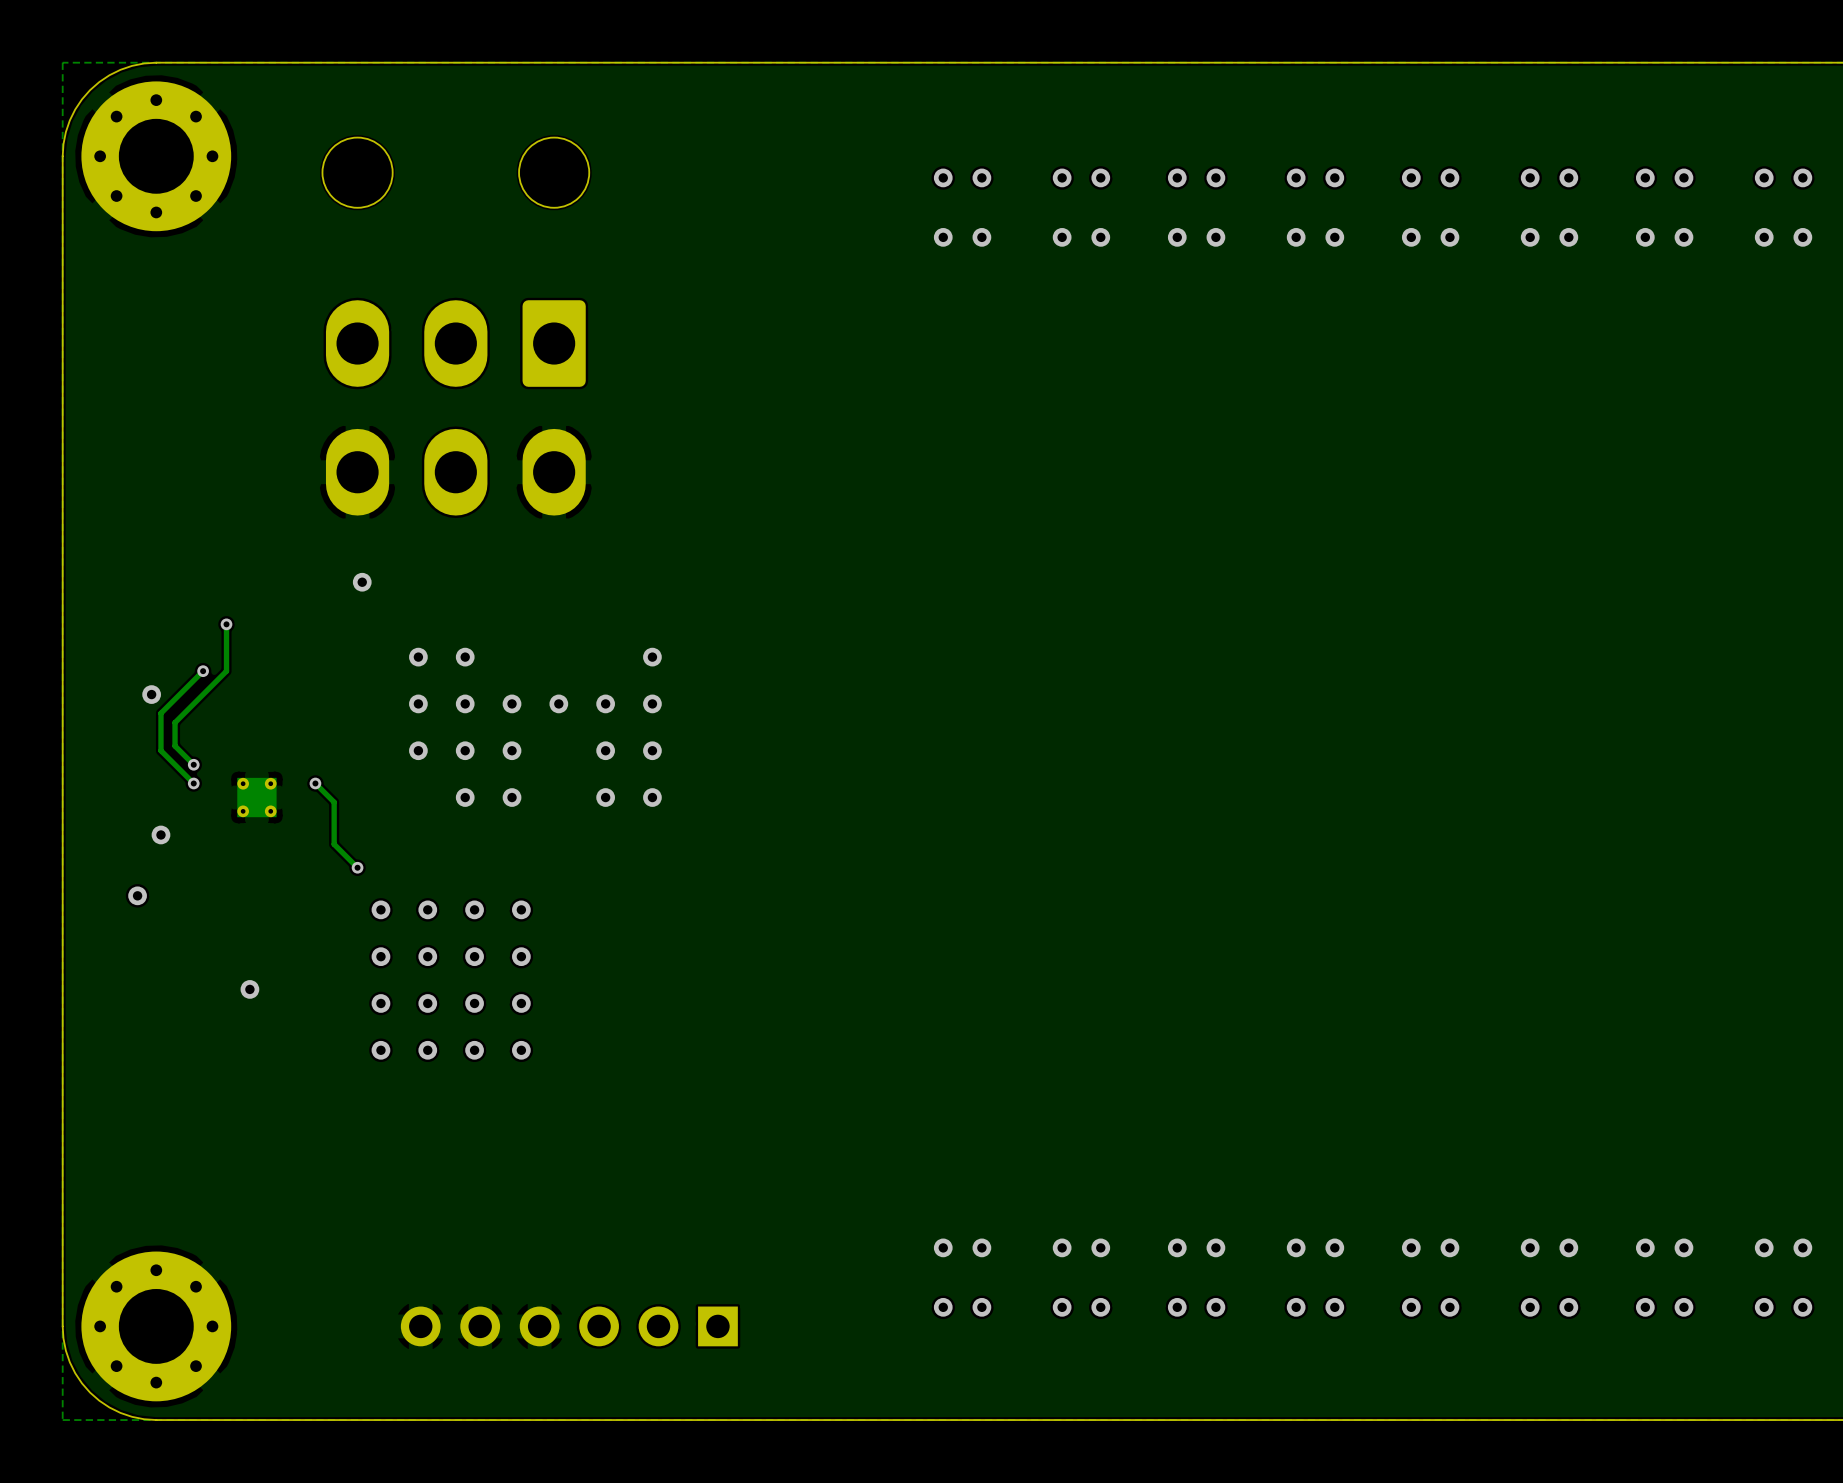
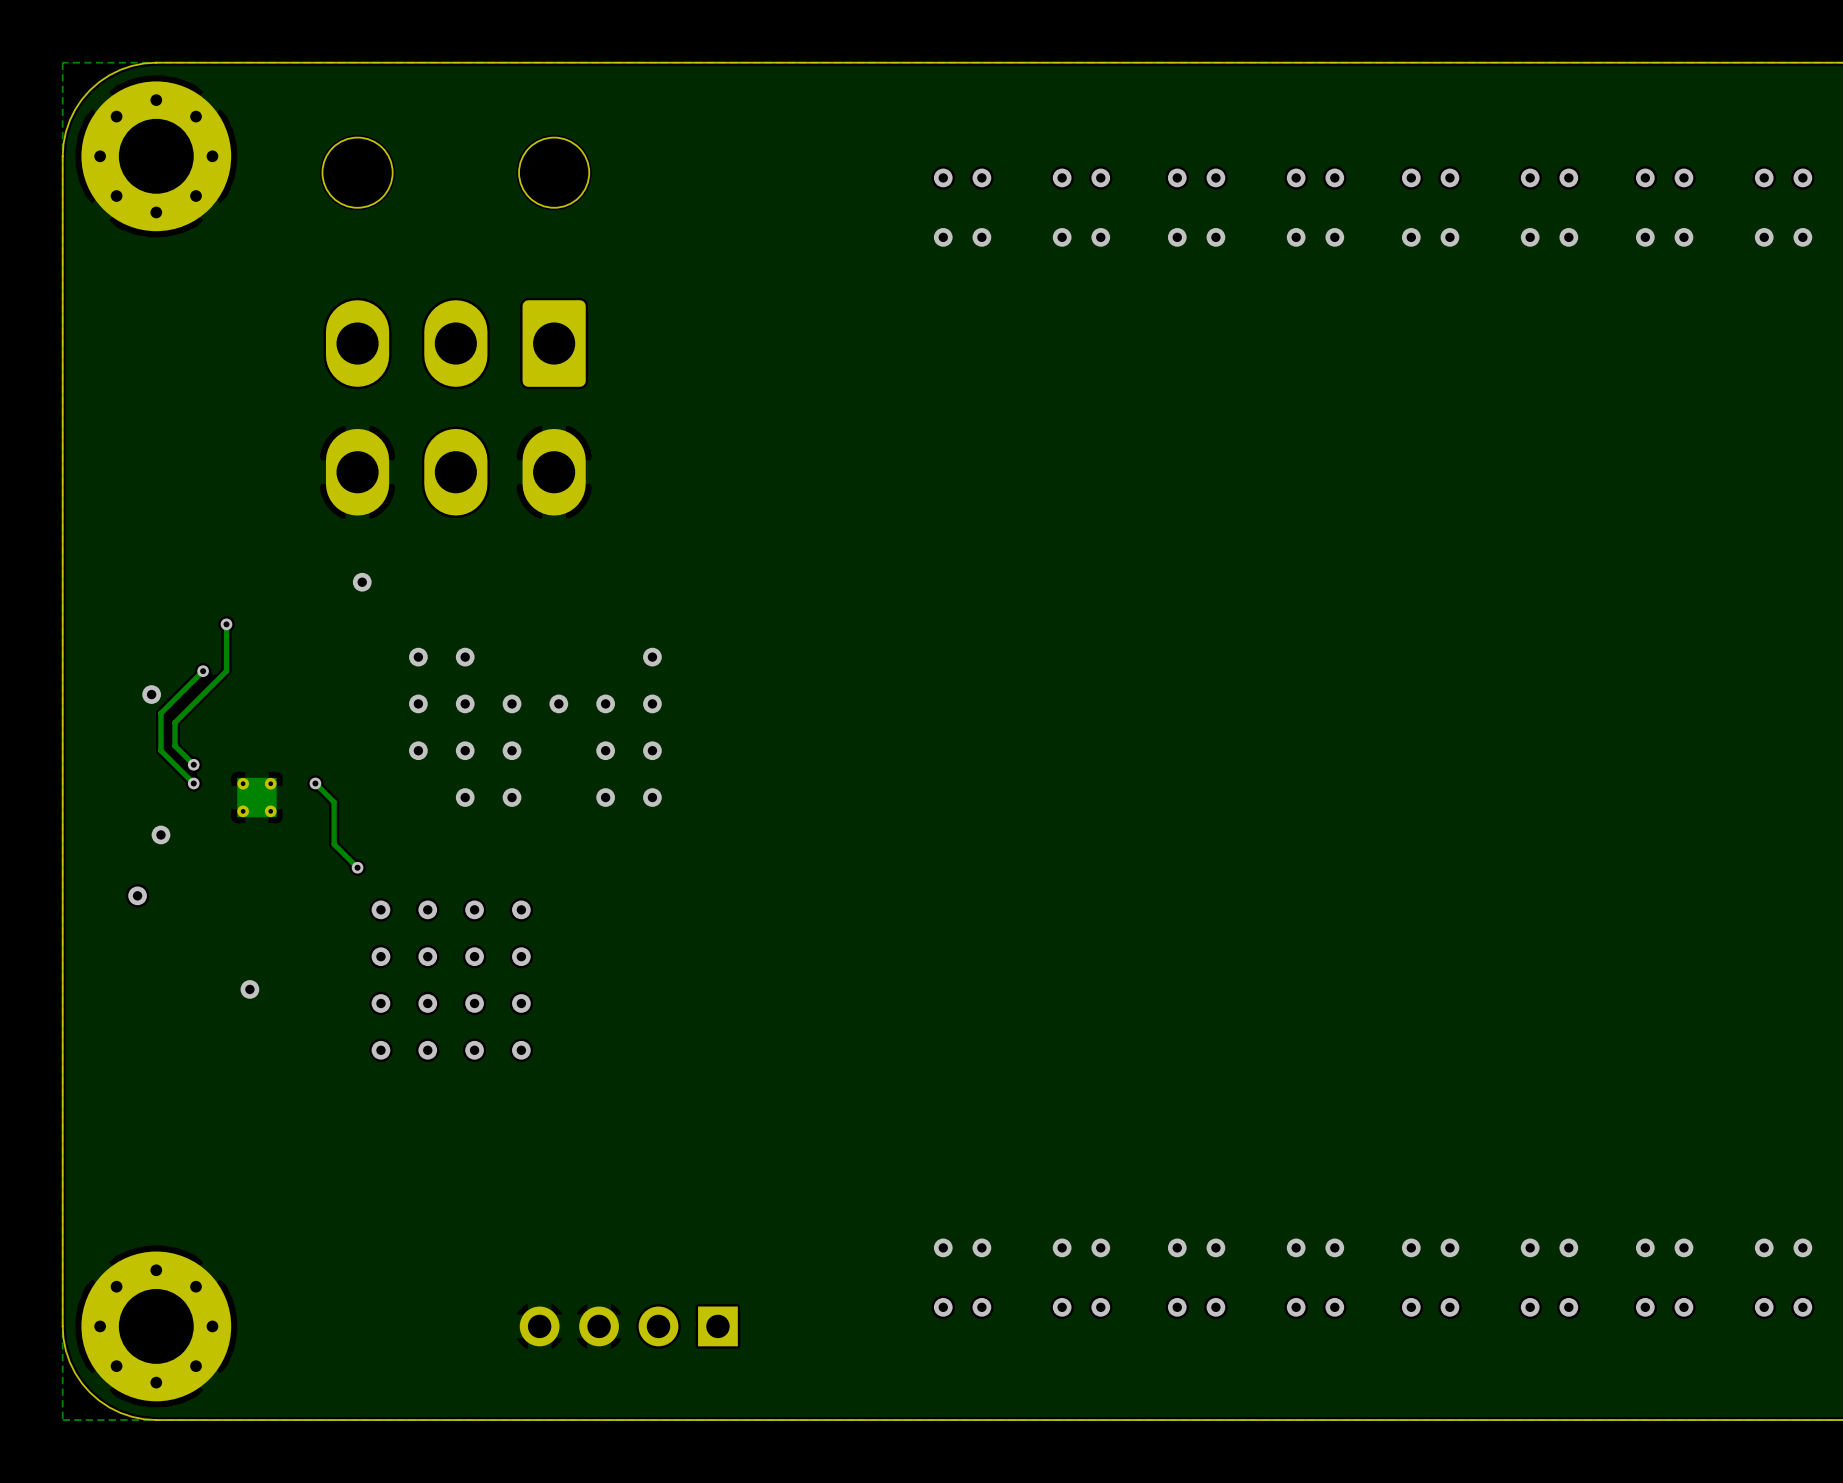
part: (569, 1326) -> none
part: none -> (628, 1326)

